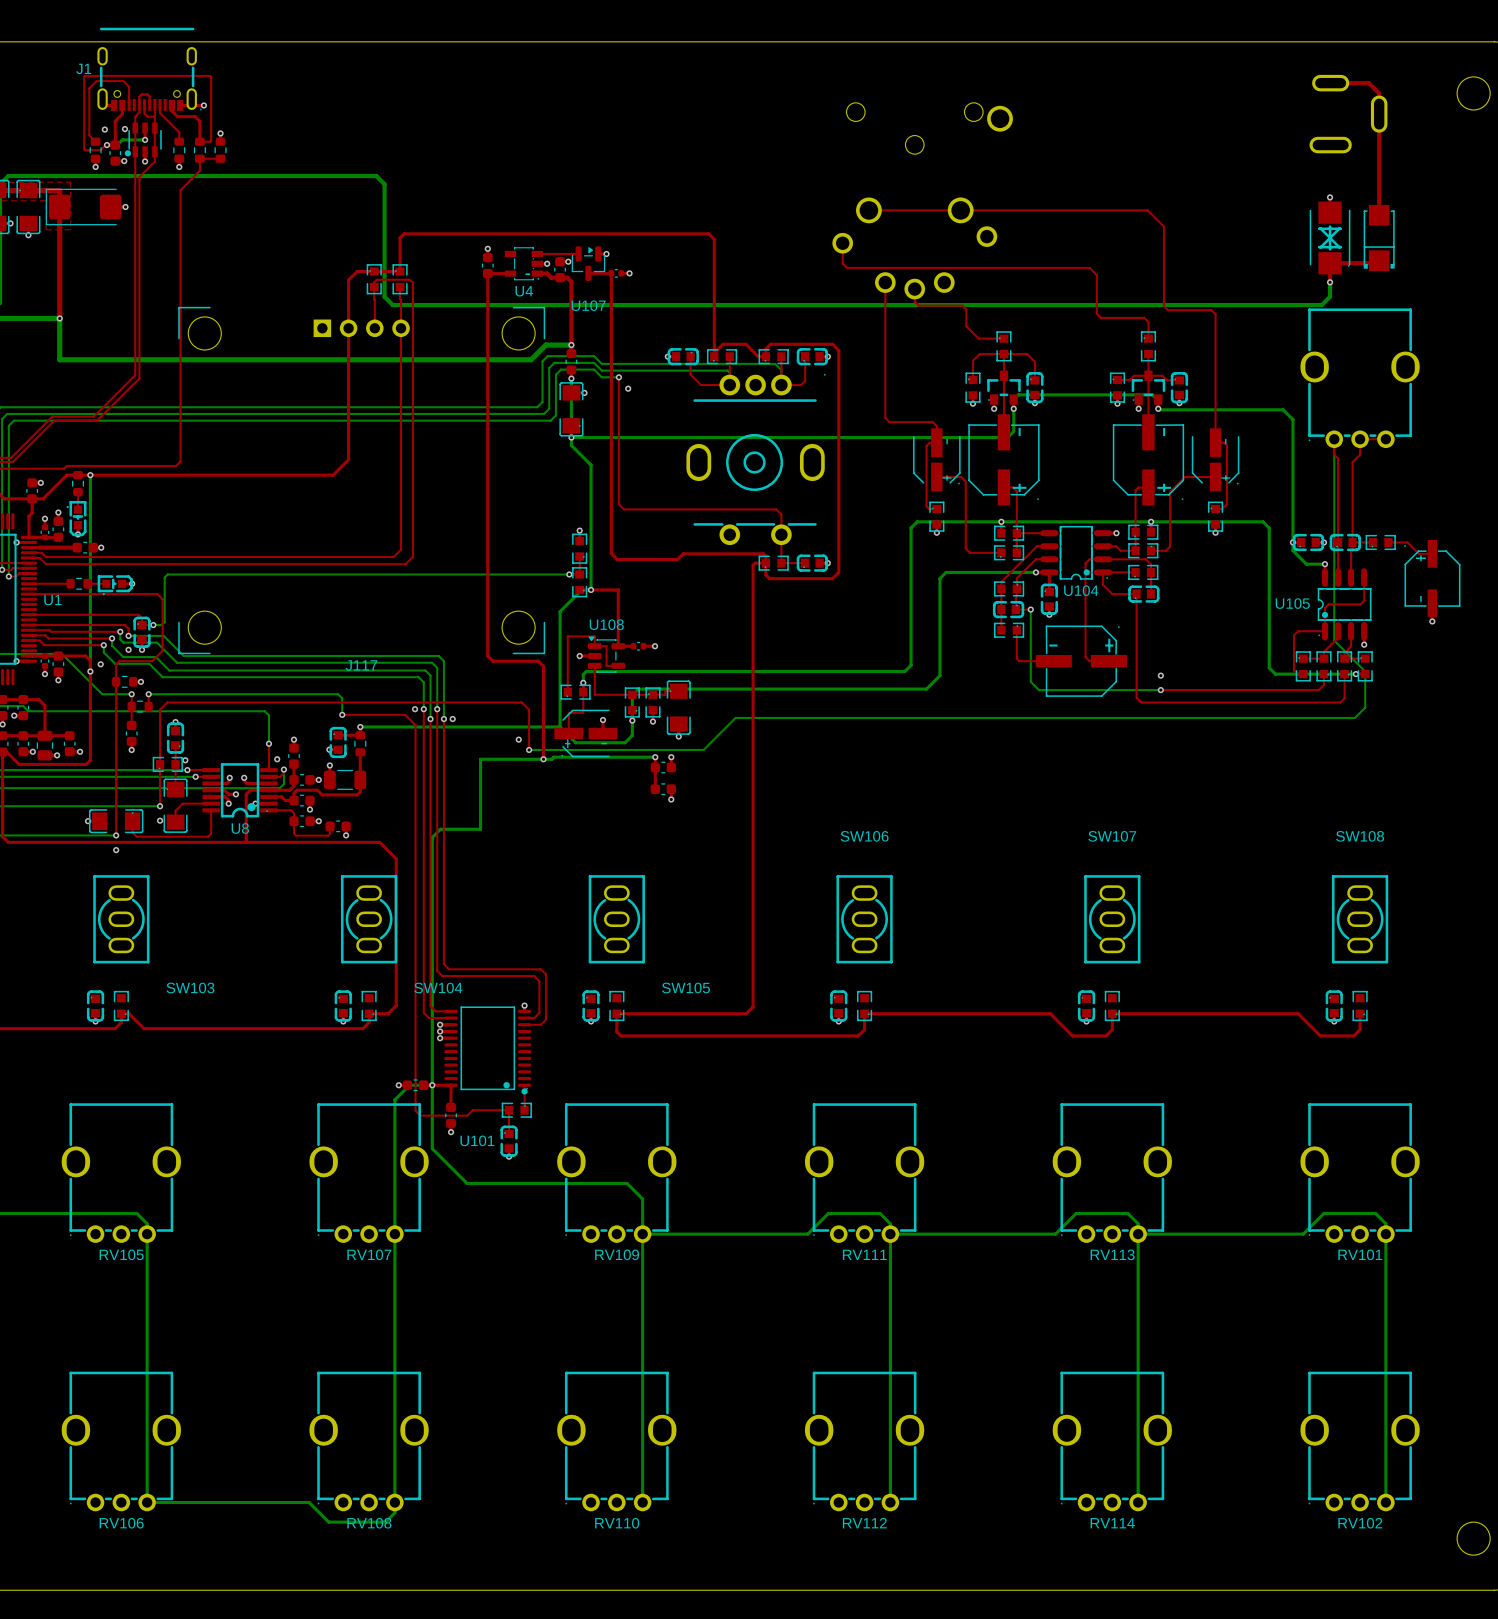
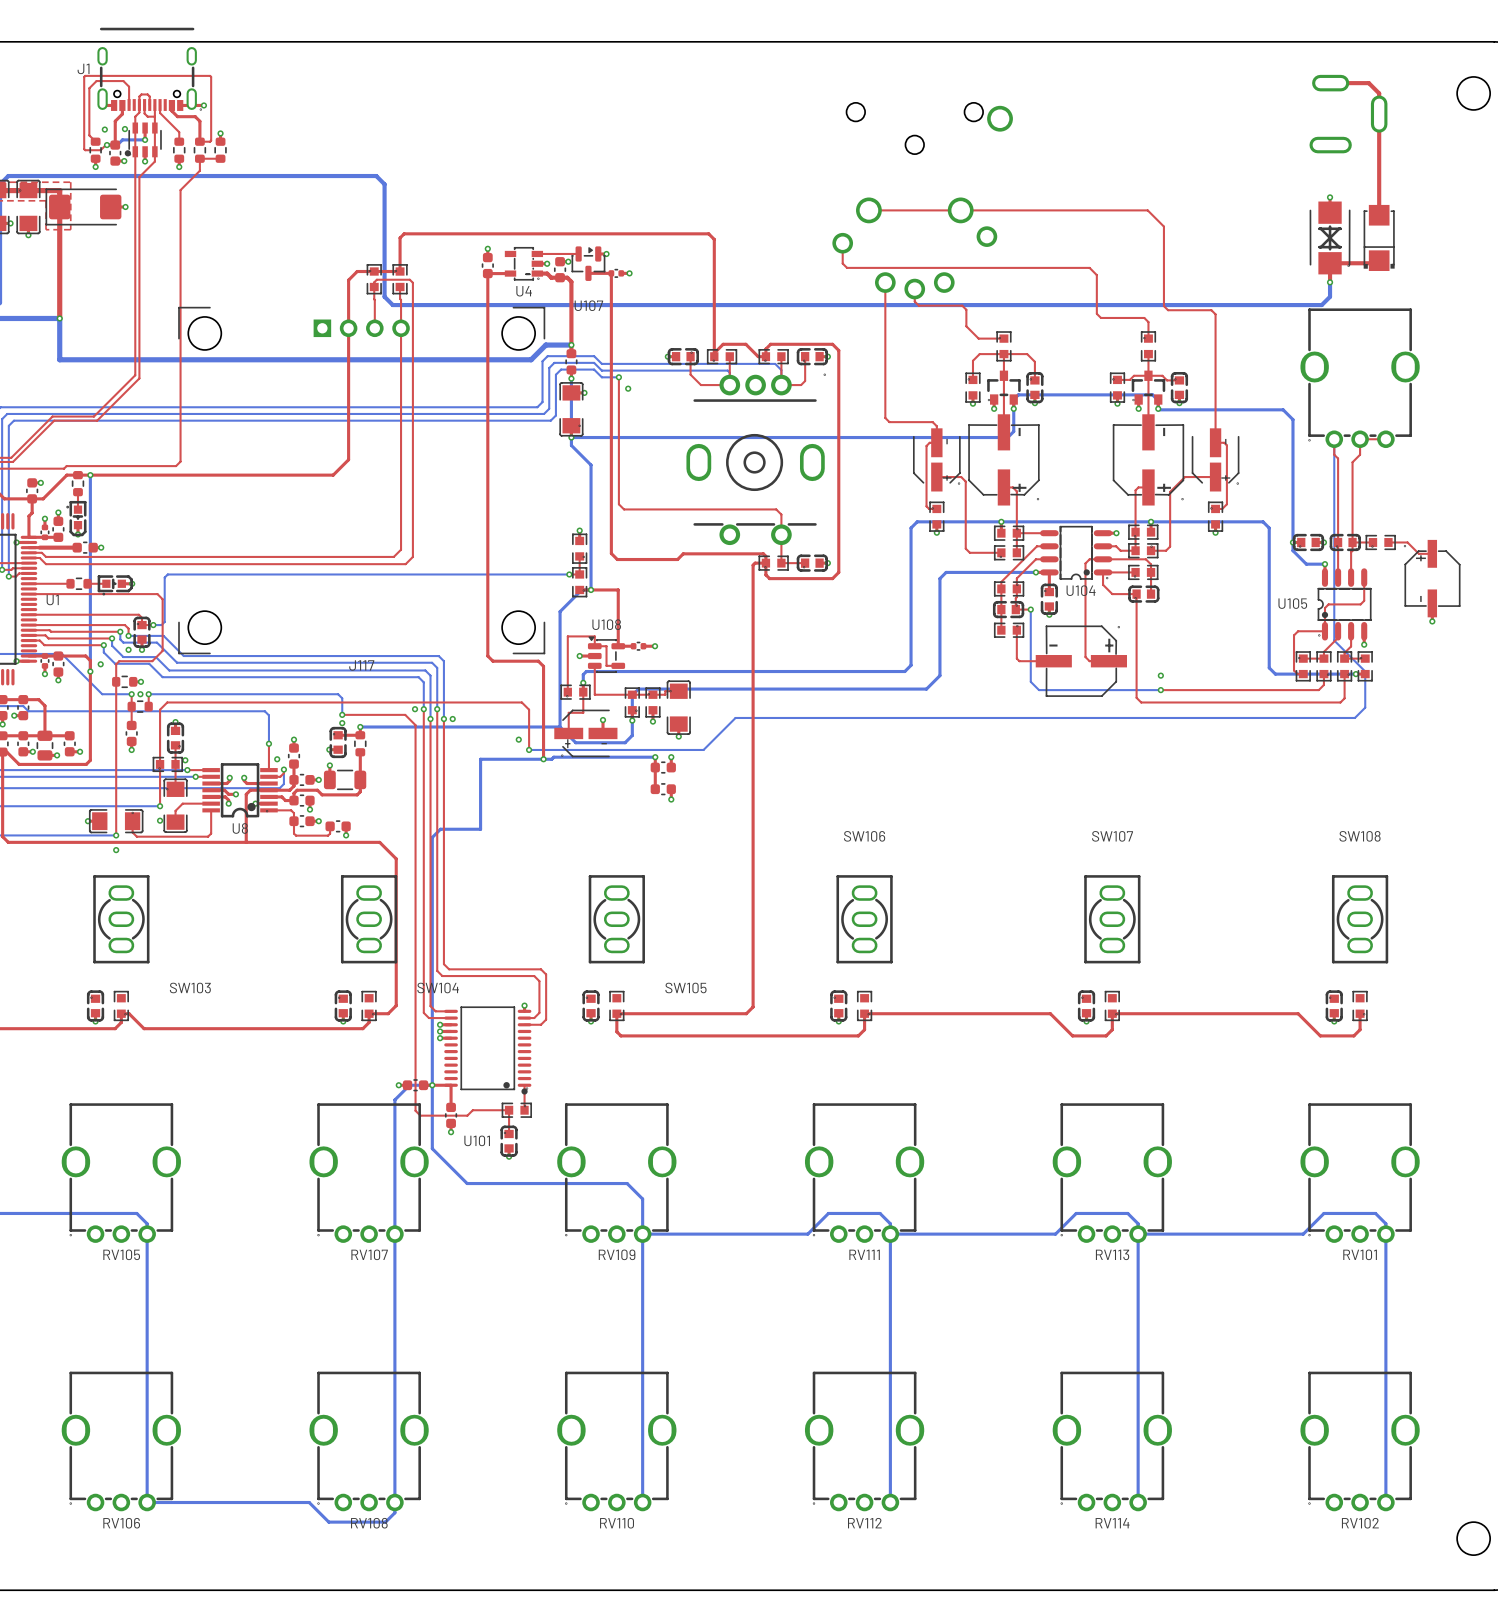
via: none -> (140, 694)
via: none -> (342, 723)

